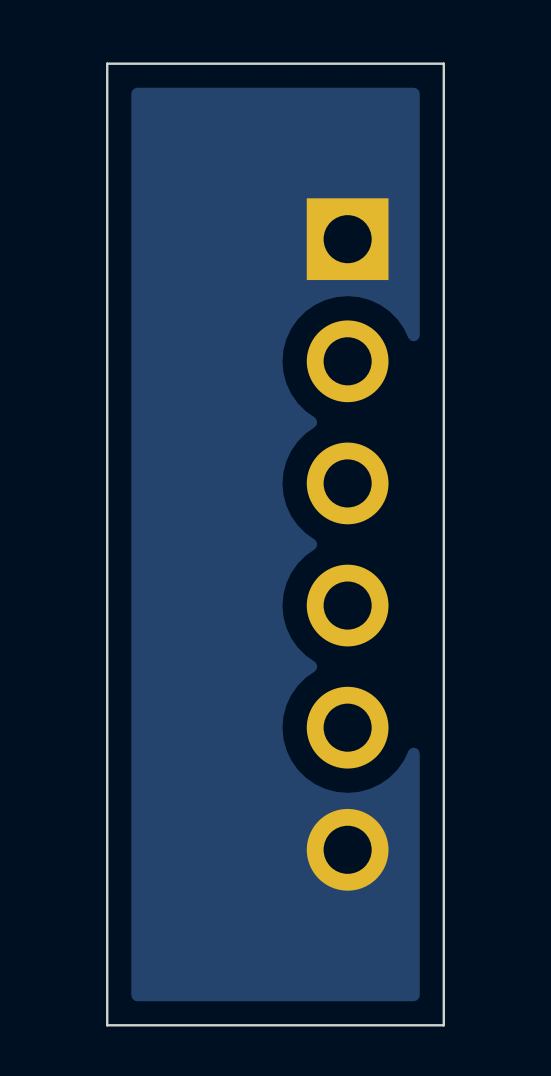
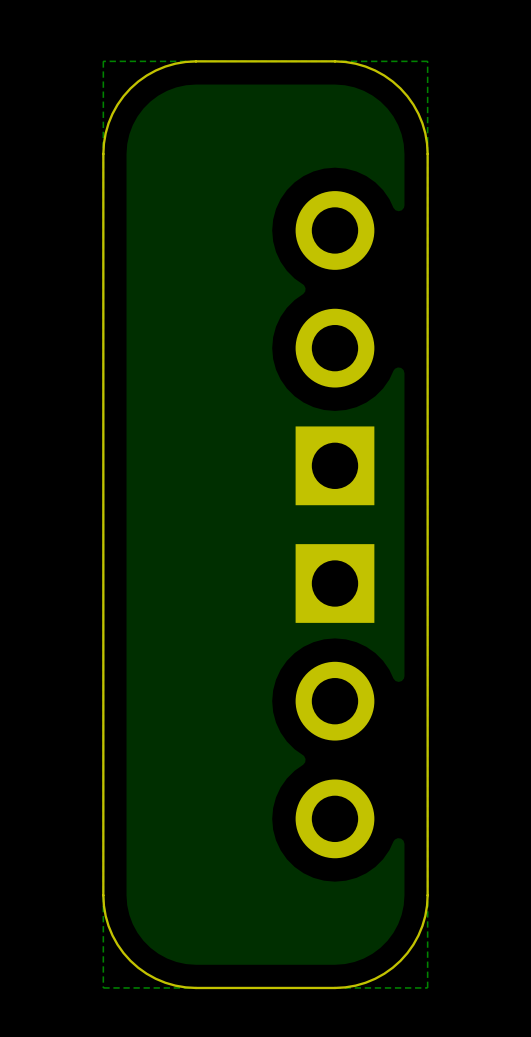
board edge: (203, 63) (107, 63) (107, 159) -> (195, 61) (165, 66) (146, 75) (130, 88) (117, 104) (108, 123) (103, 154)
board edge: (347, 63) (443, 63) (443, 159) -> (334, 61) (365, 66) (384, 75) (400, 88) (413, 104) (422, 123) (427, 154)
part footprint: [306, 198, 389, 891] -> [295, 191, 375, 859]
board edge: (107, 929) (107, 1025) (203, 1025) -> (103, 895) (108, 925) (117, 944) (130, 960) (146, 973) (165, 982) (195, 987)
board edge: (443, 929) (443, 1025) (347, 1025) -> (427, 895) (422, 925) (413, 944) (400, 960) (384, 973) (365, 982) (334, 987)

